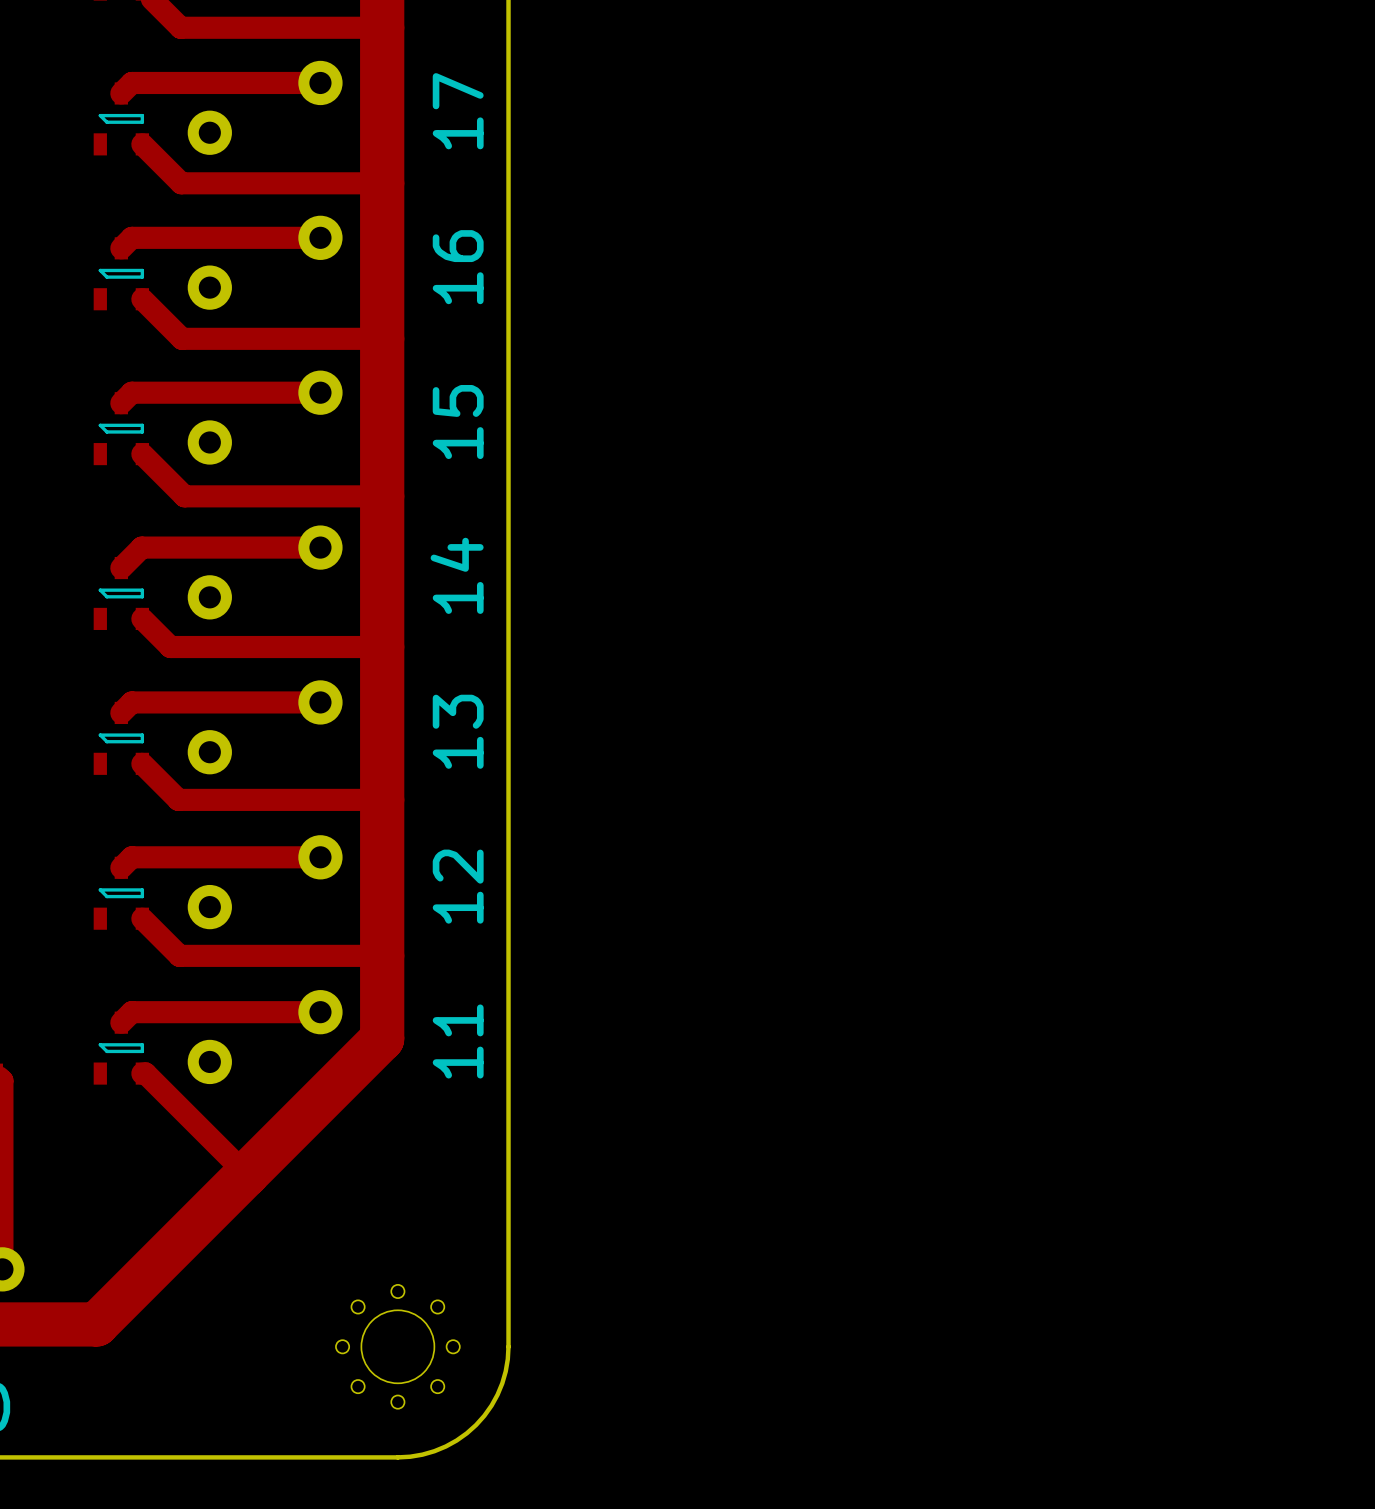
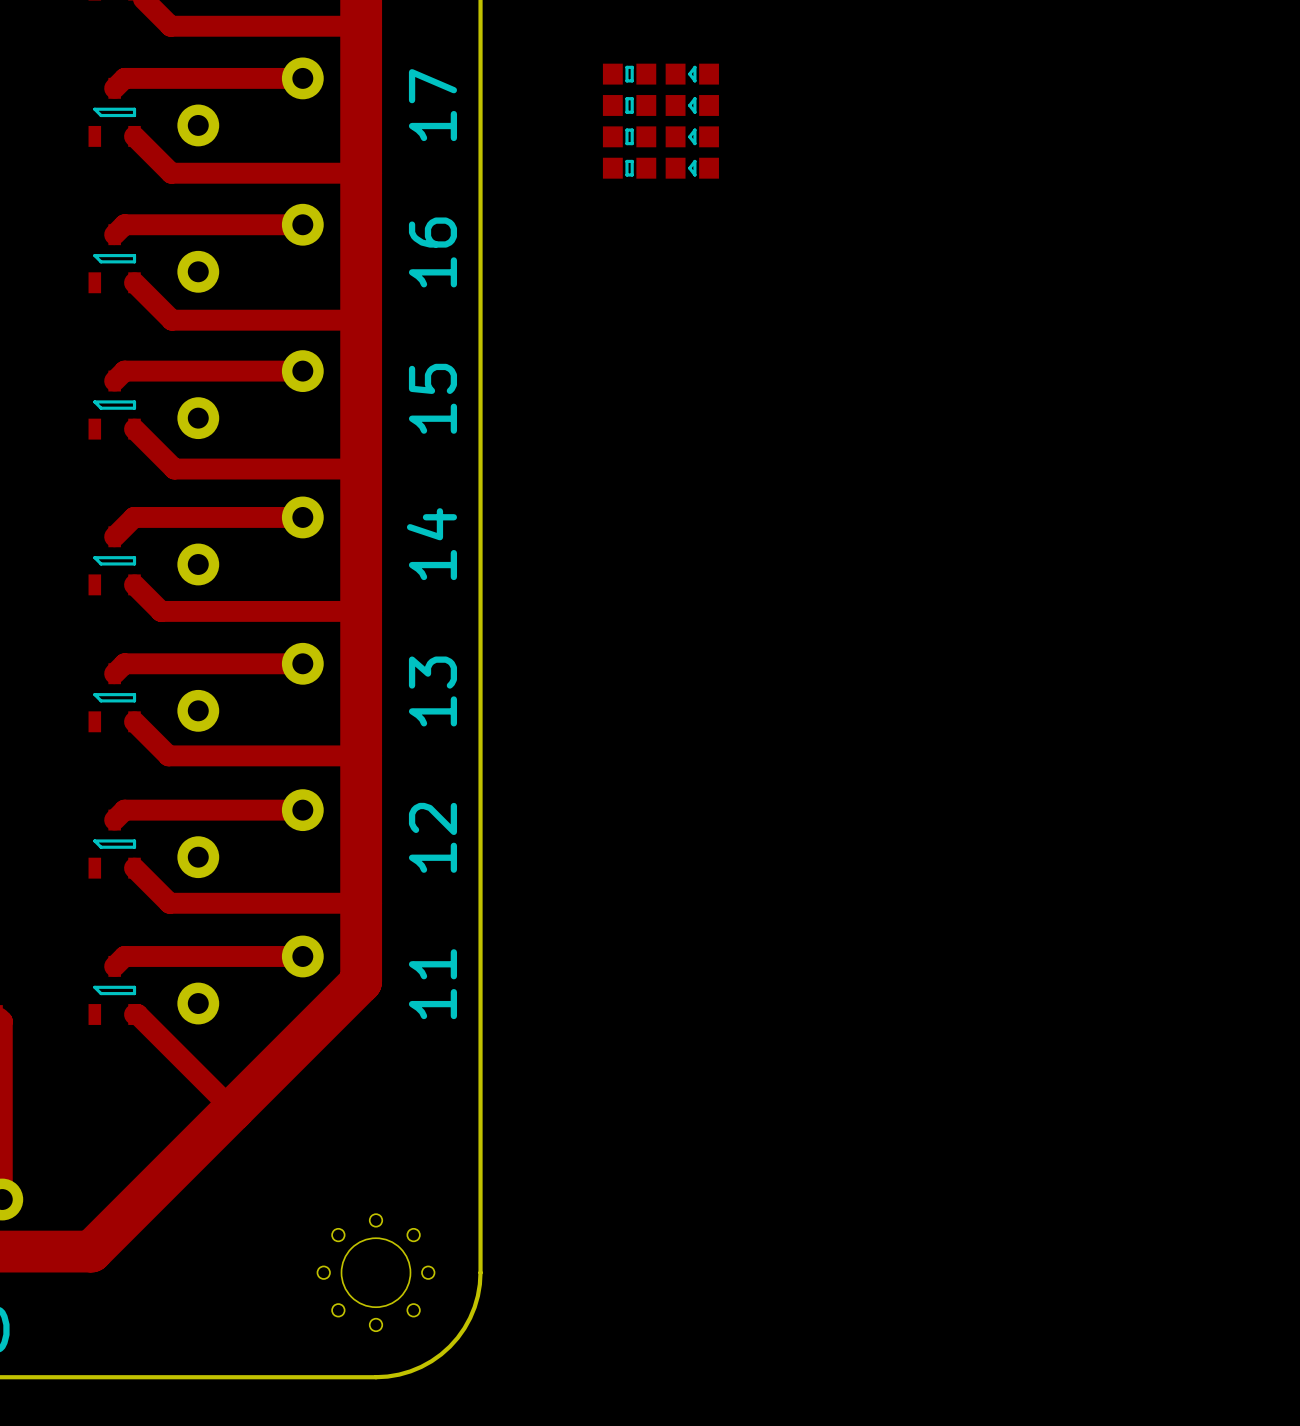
part: none -> (629, 74)
part: none -> (692, 74)
part: none -> (629, 105)
part: none -> (692, 105)
part: none -> (629, 136)
part: none -> (692, 136)
part: none -> (629, 168)
part: none -> (692, 168)

